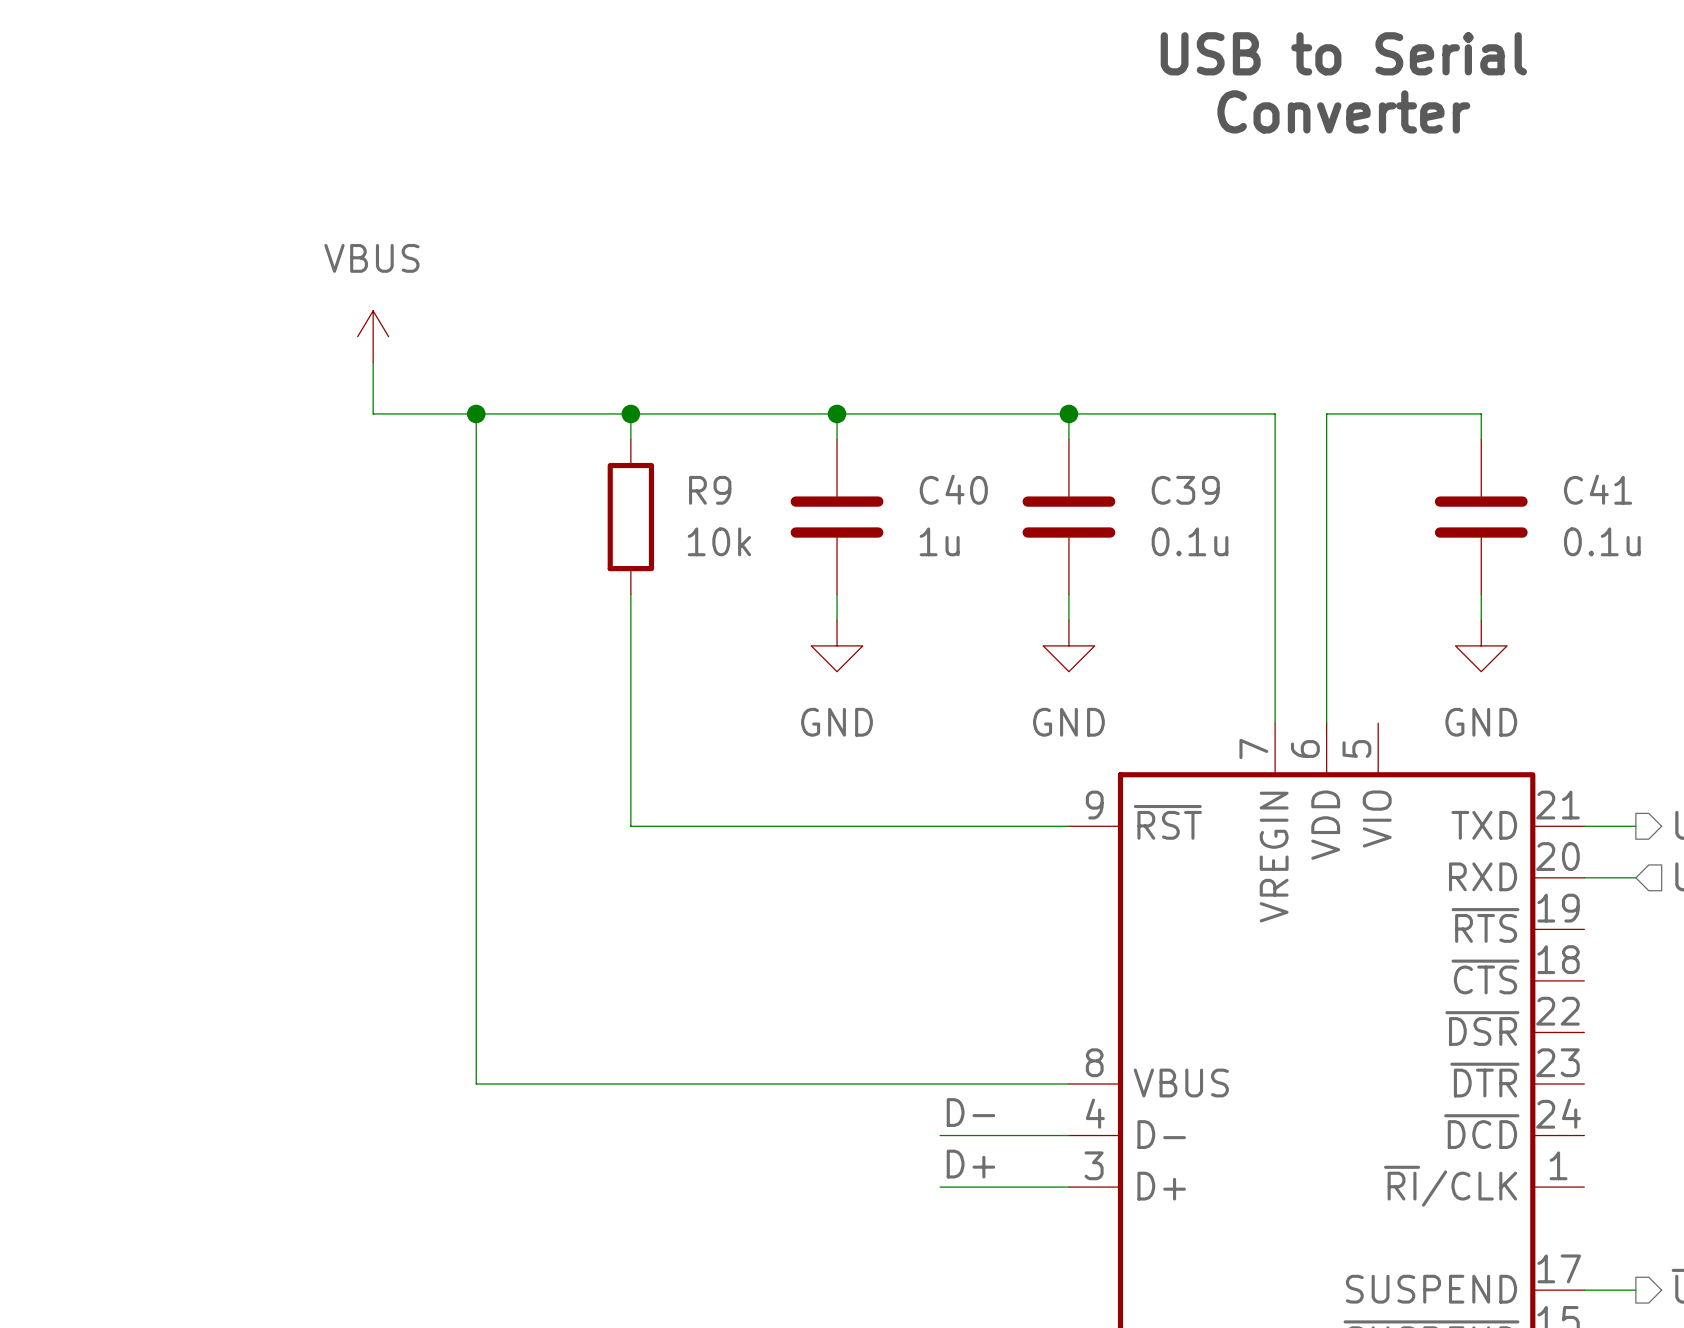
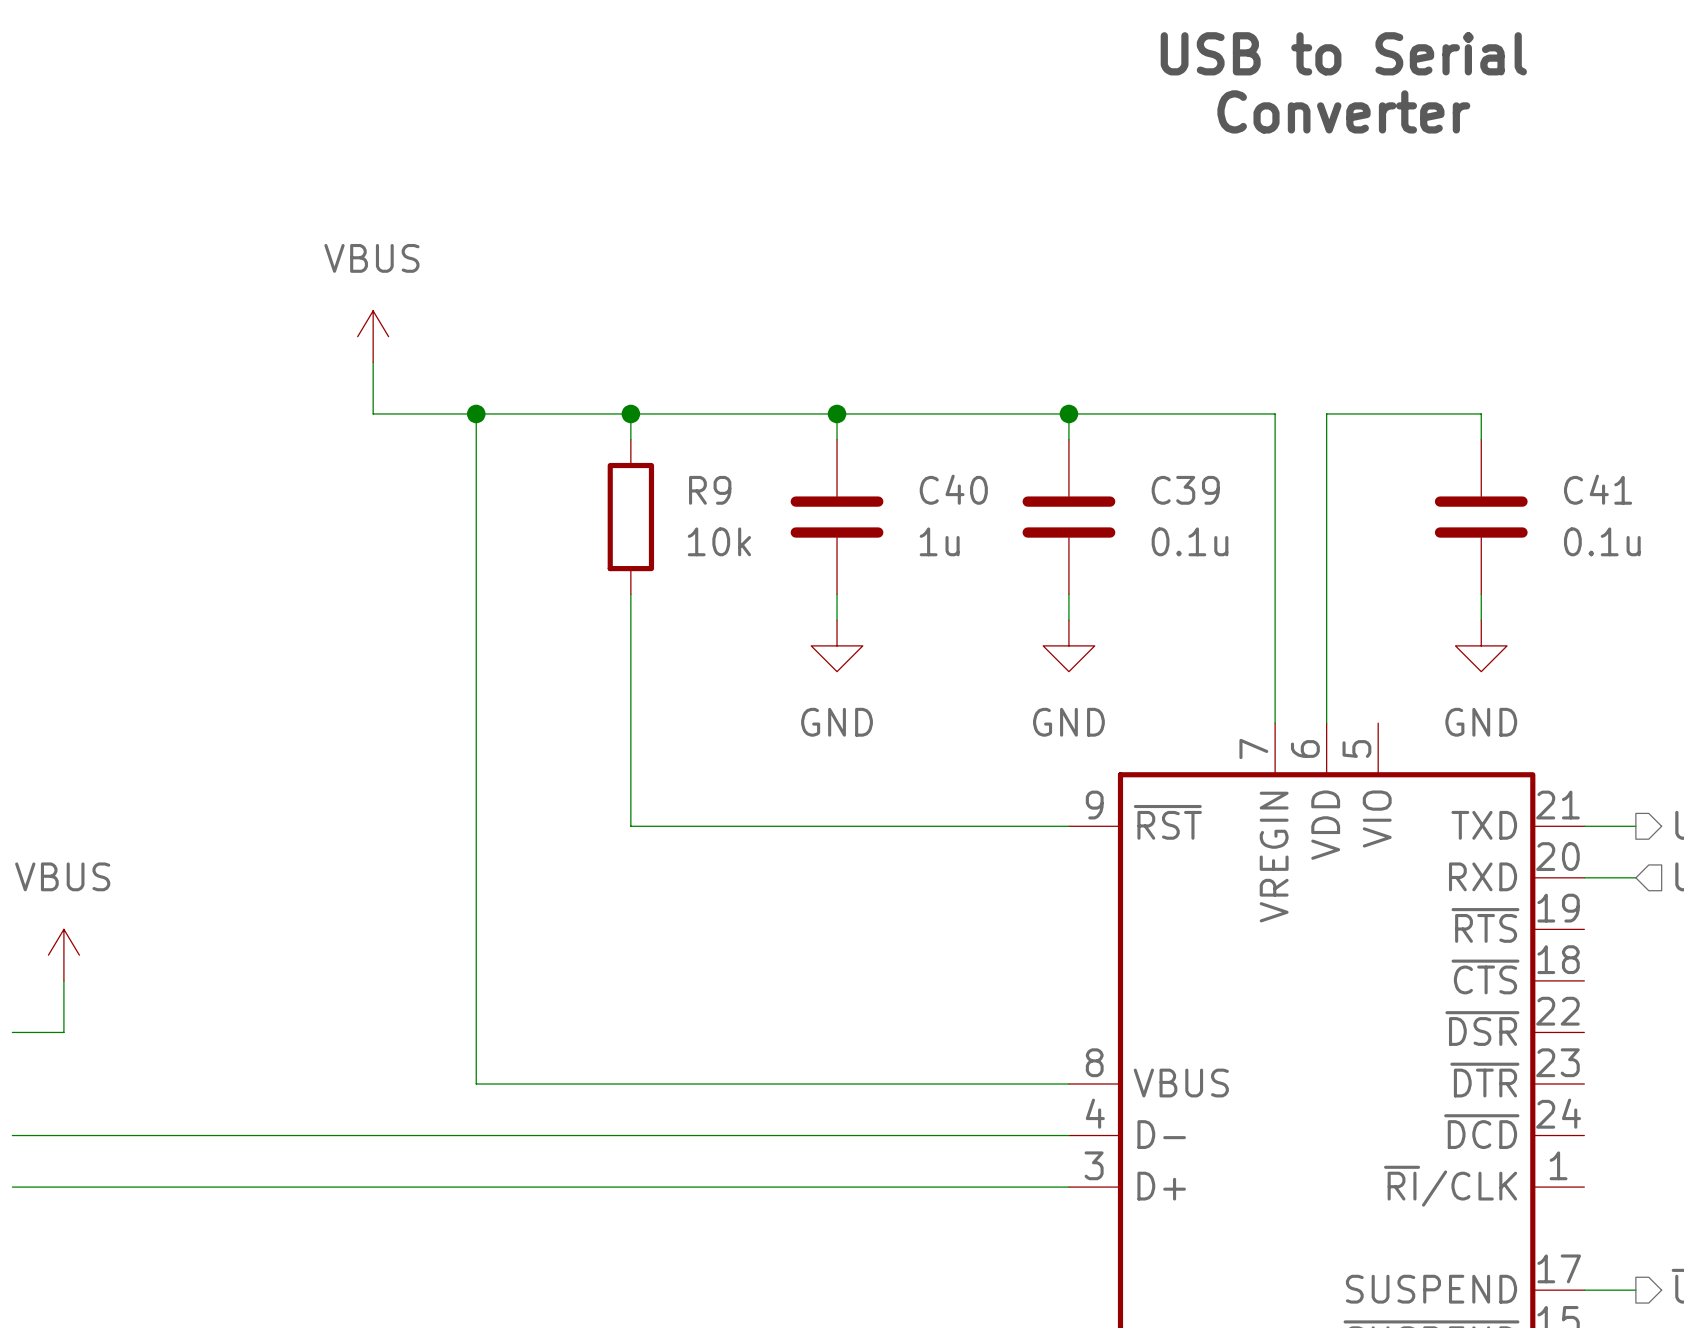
power symbol: none -> VBUS (63, 955)
wire: none -> (63, 980) (63, 1032) (12, 1032)
label: D- (970, 1112) -> none
wire: none -> (12, 1135) (940, 1135)
label: D+ (970, 1164) -> none
wire: none -> (12, 1187) (940, 1187)

